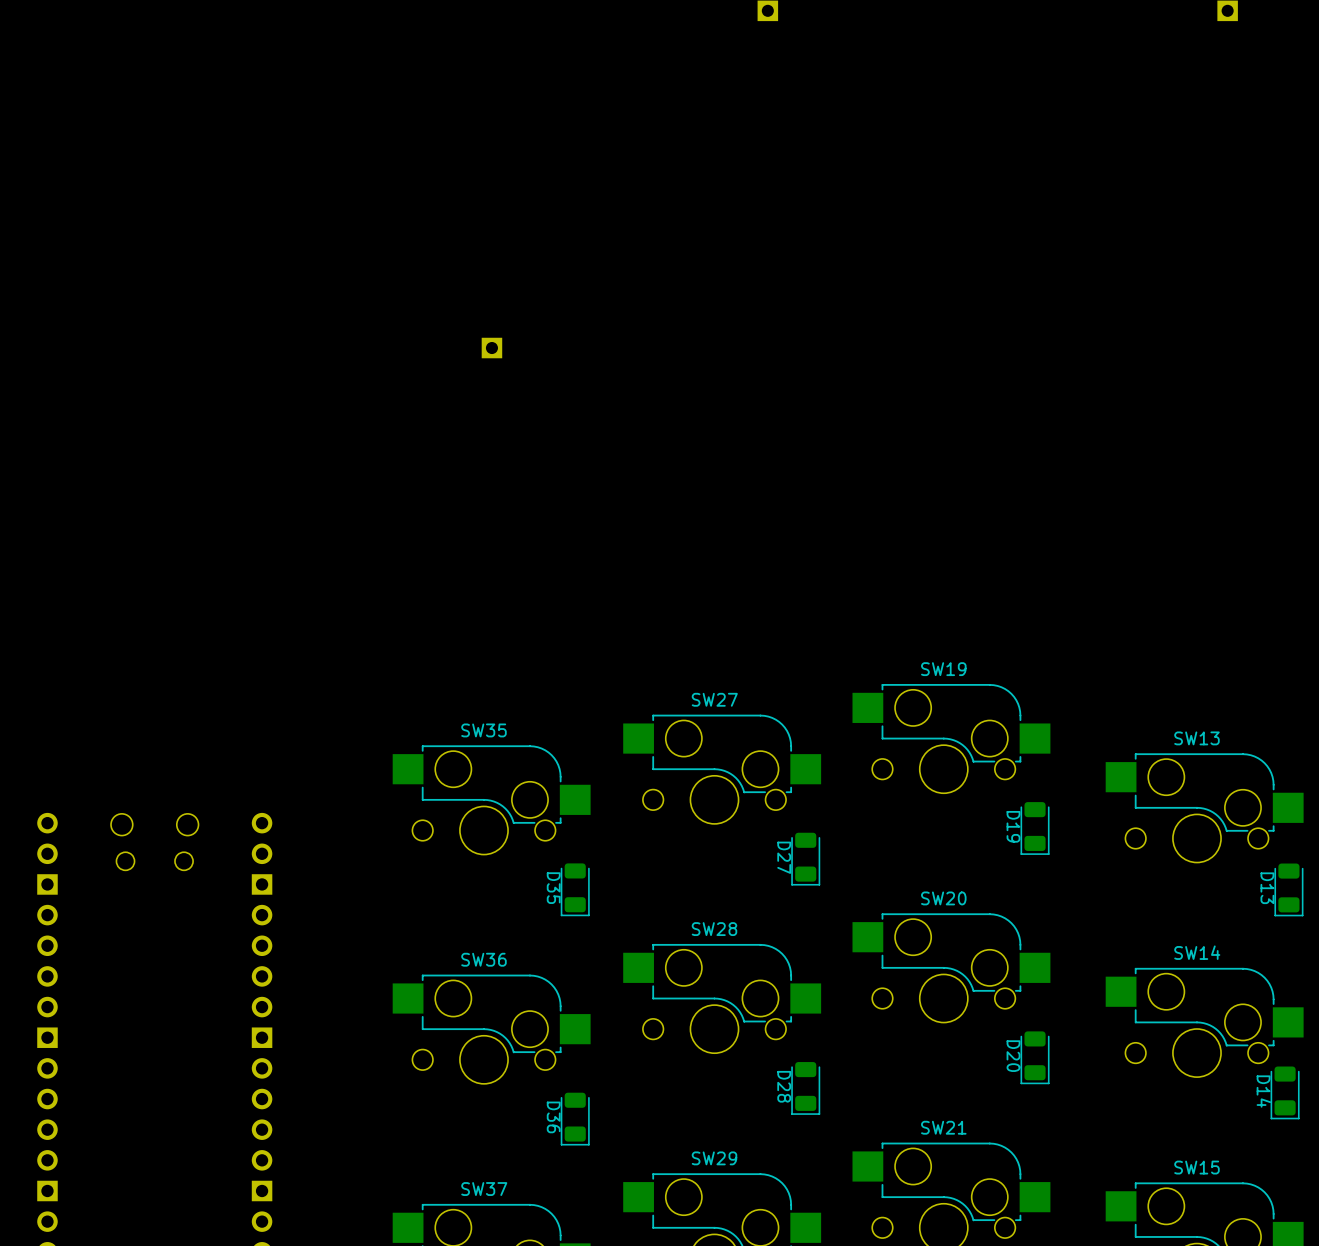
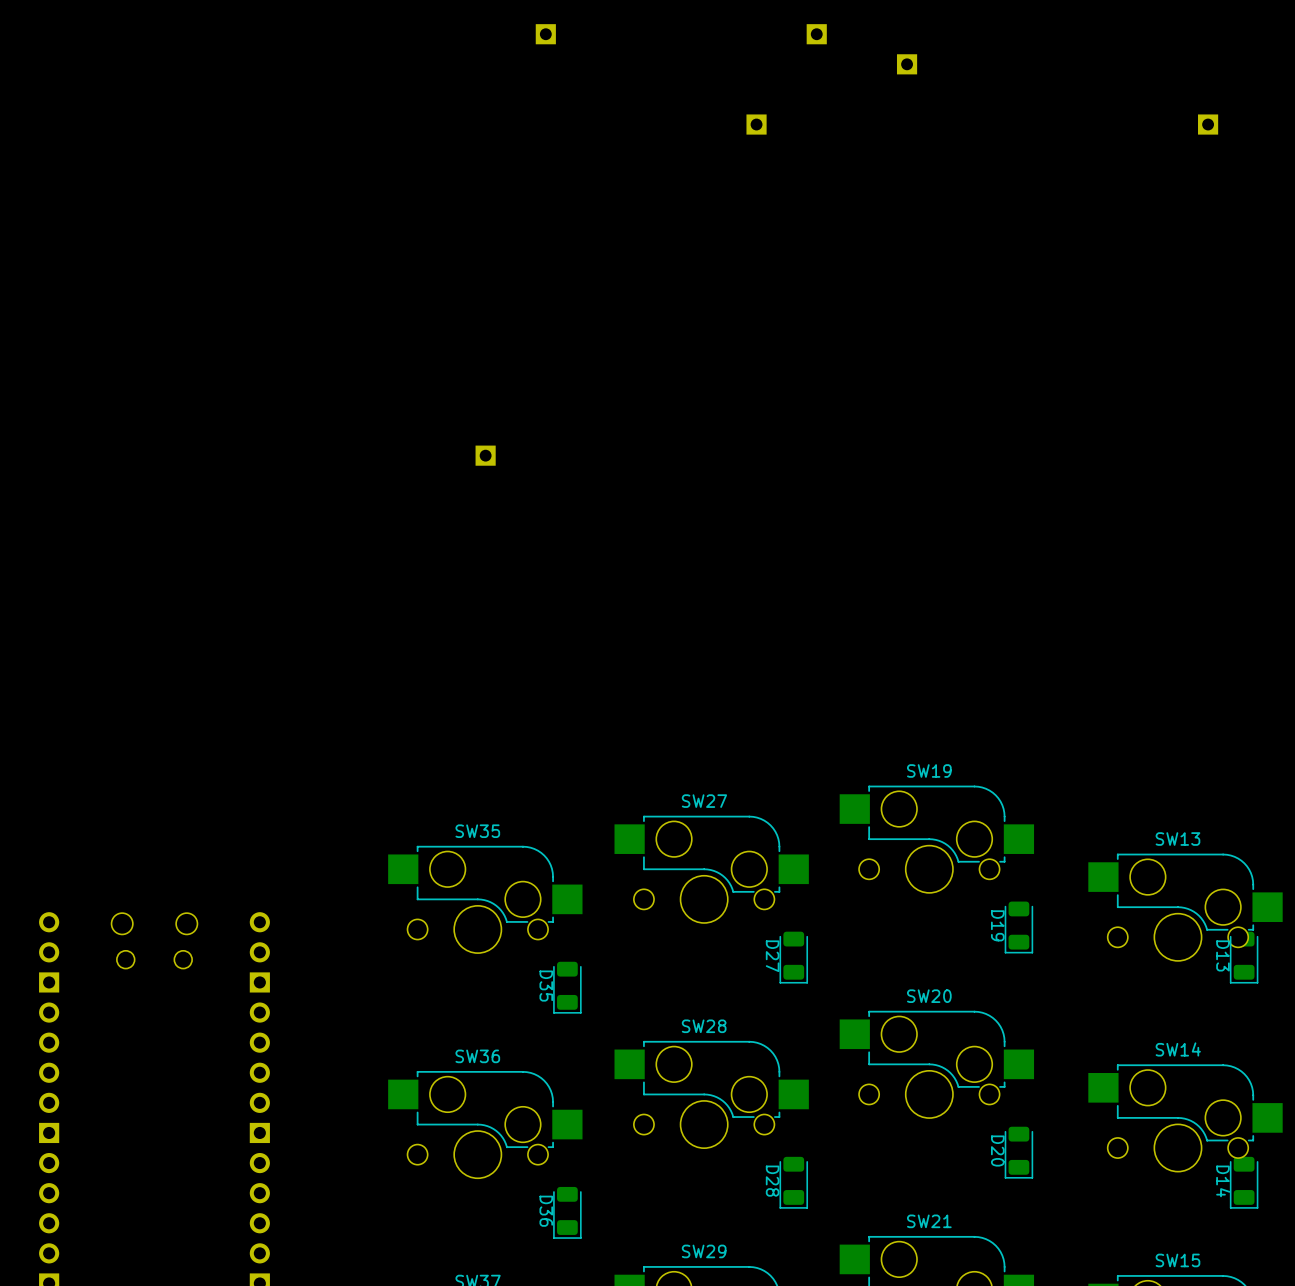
D13 position: (1288, 889) -> (1244, 957)
D14 position: (1285, 1092) -> (1244, 1182)

